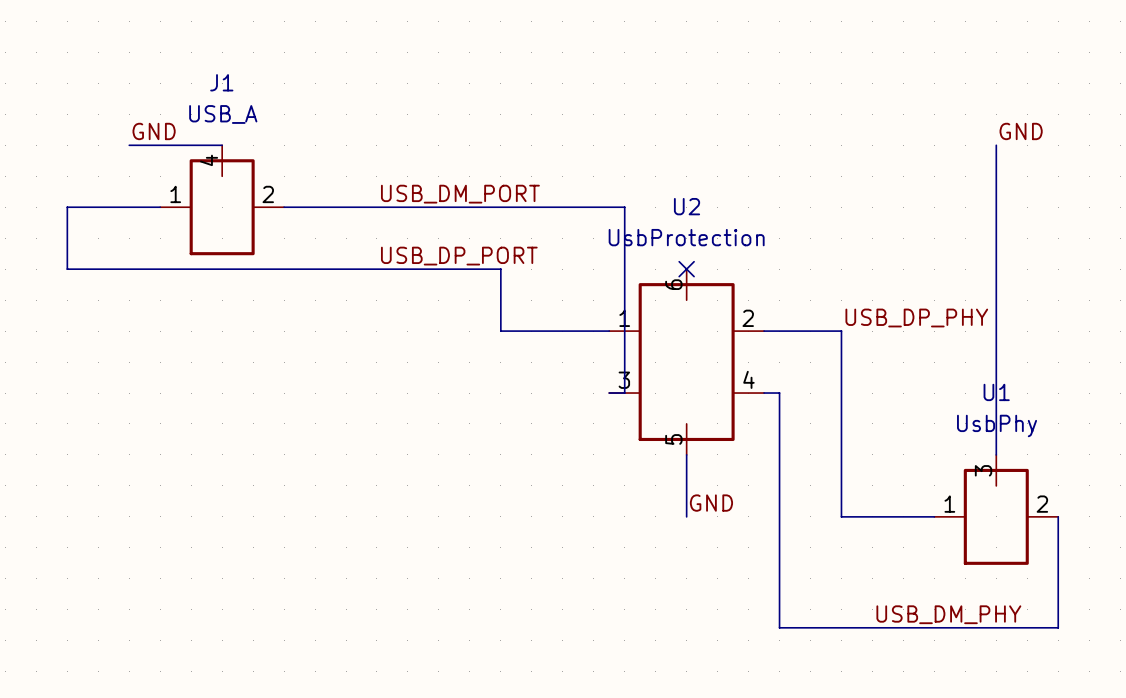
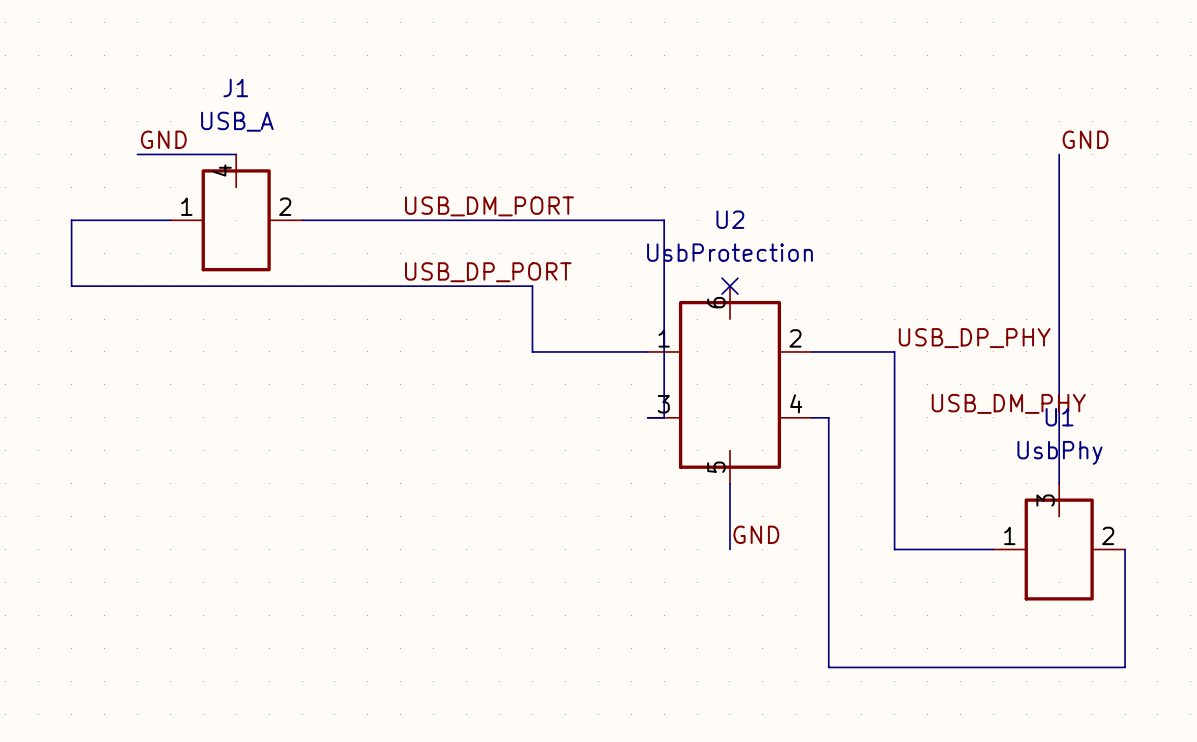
label position: USB_DM_PHY (948, 614) -> USB_DM_PHY (1008, 403)

